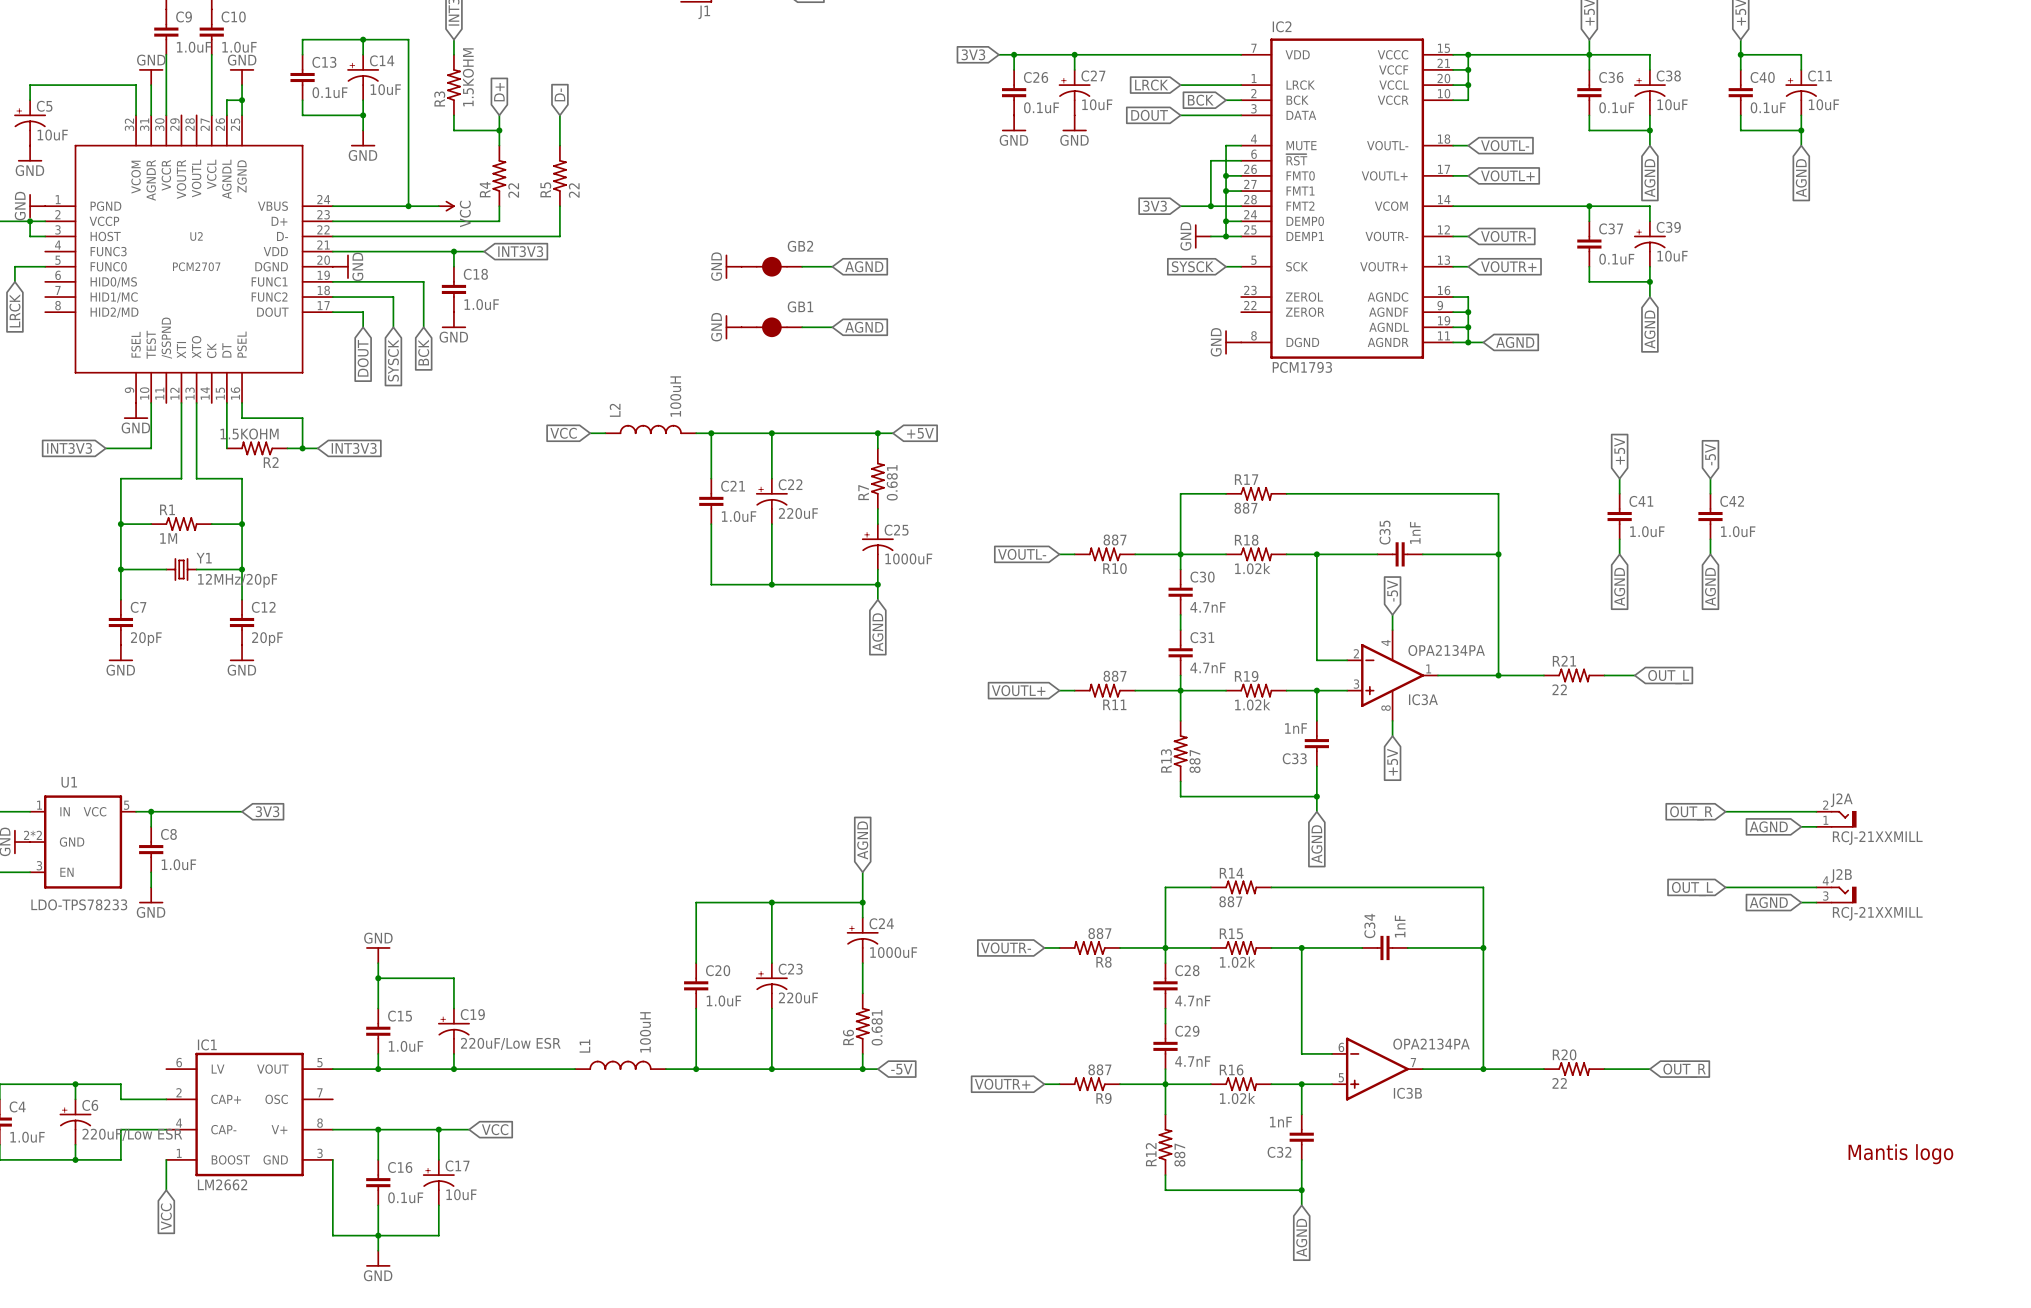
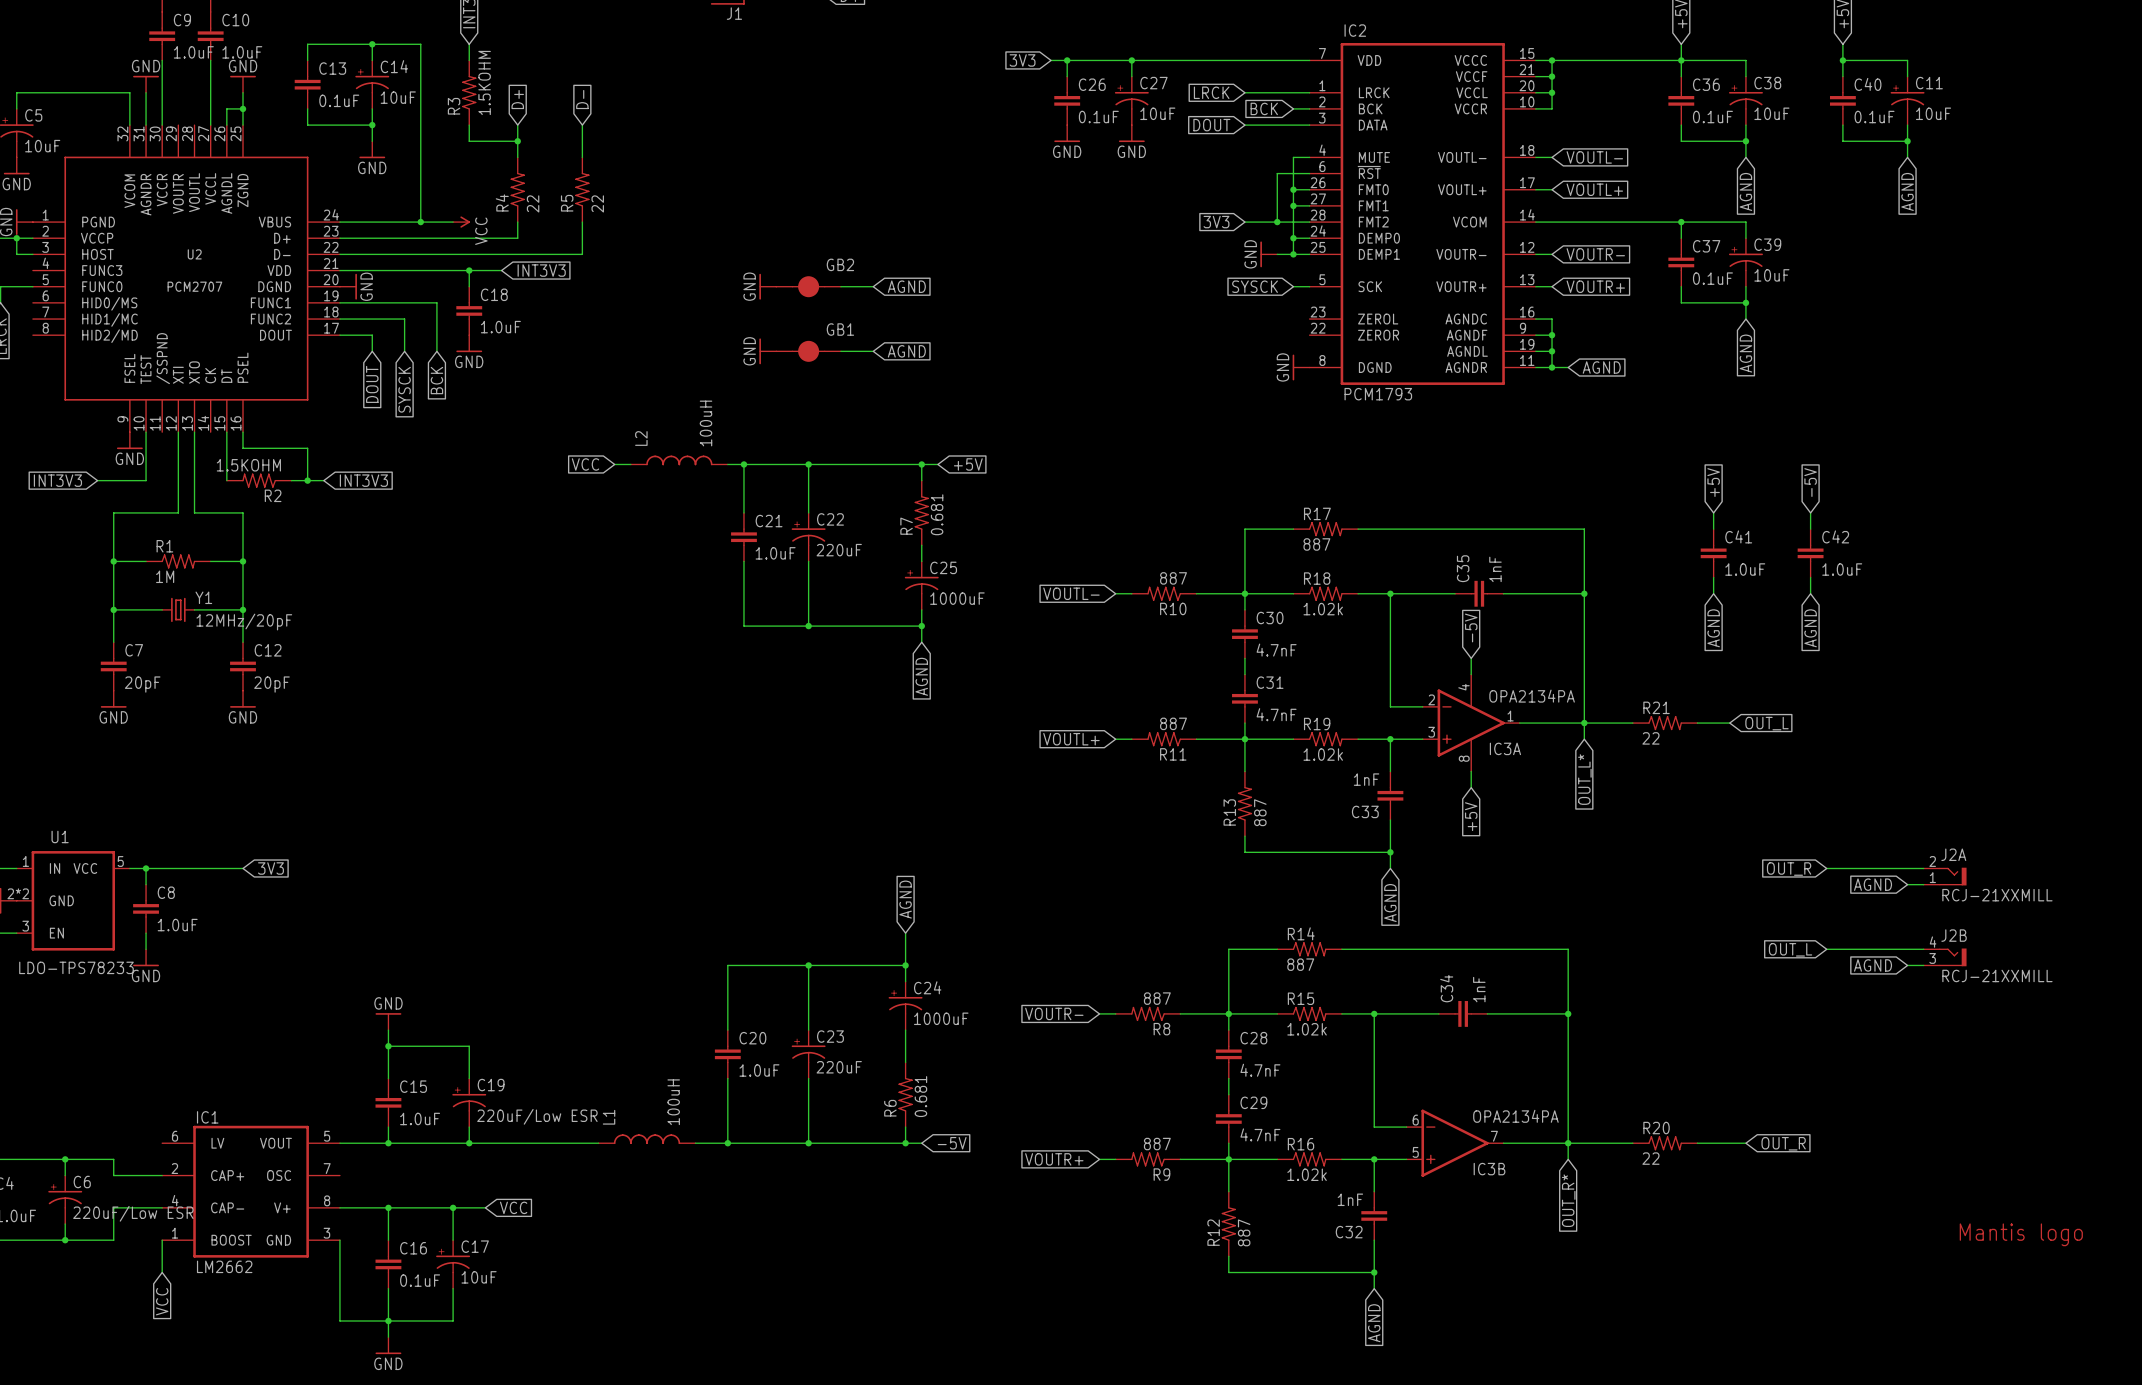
wire: none -> (1584, 723) (1584, 739)
global label: none -> OUT_L* (1584, 779)
wire: none -> (1568, 1143) (1568, 1159)
global label: none -> OUT_R* (1568, 1200)

